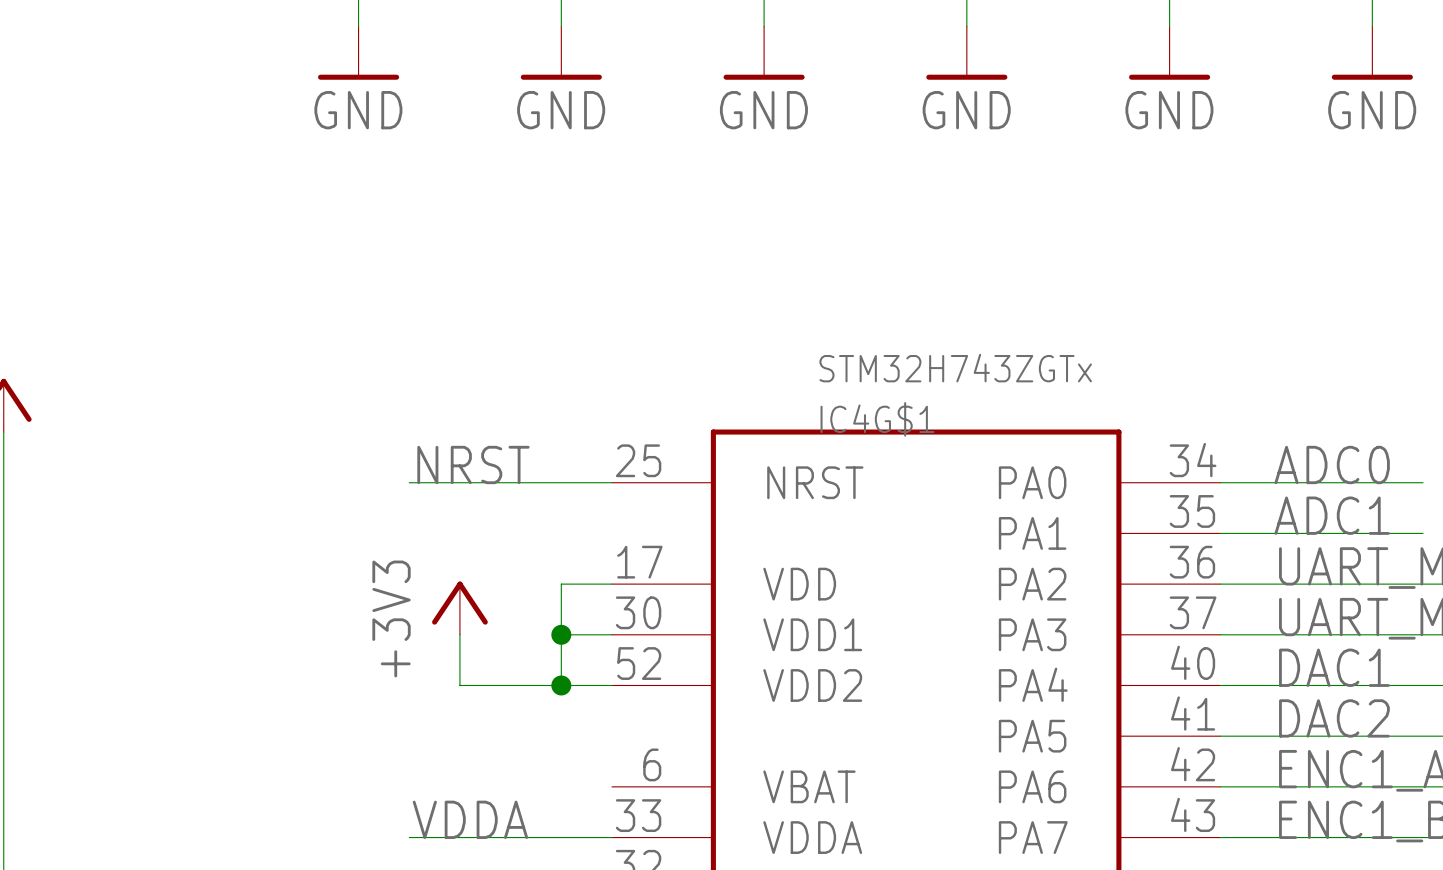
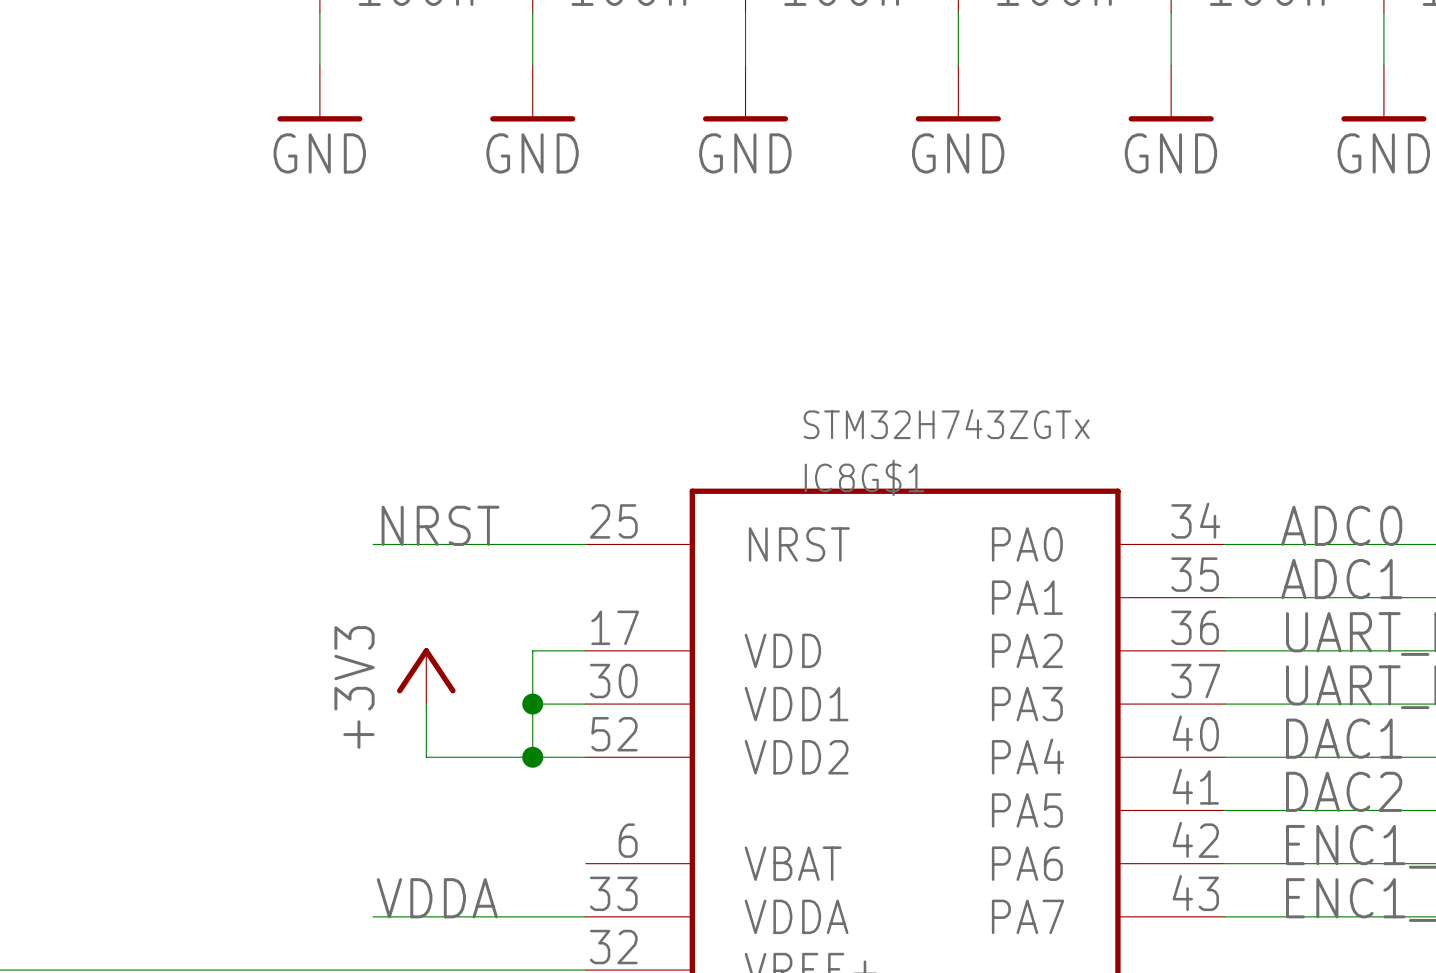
IC4G$1 name: IC4G$1 (877, 419) -> IC8G$1 (864, 477)

